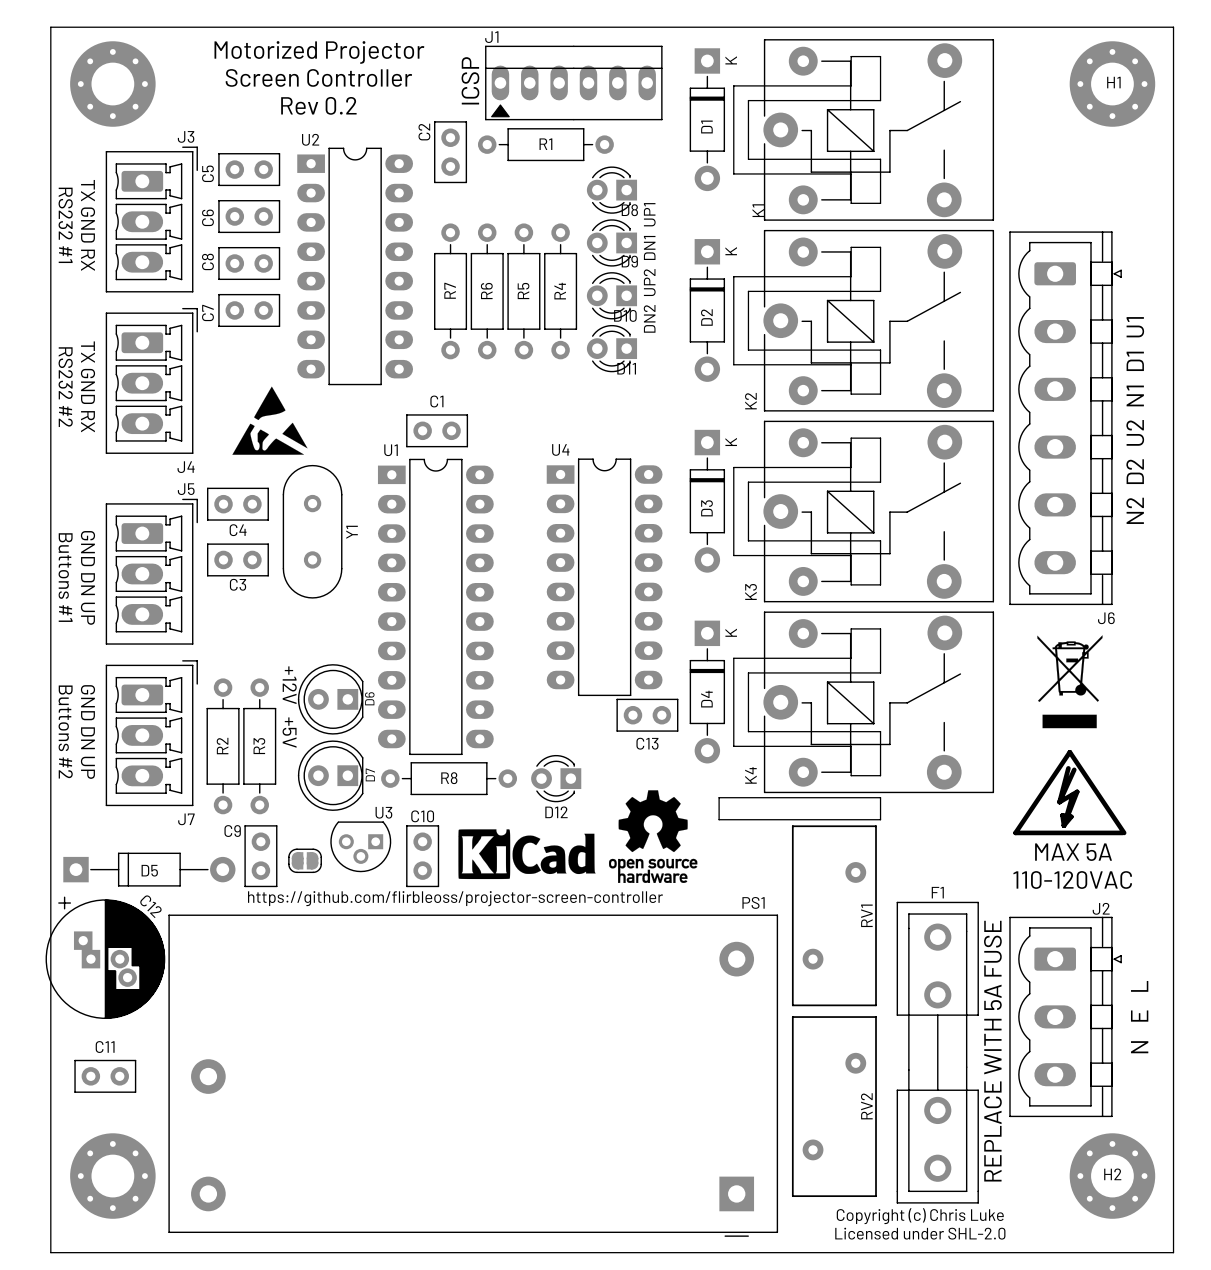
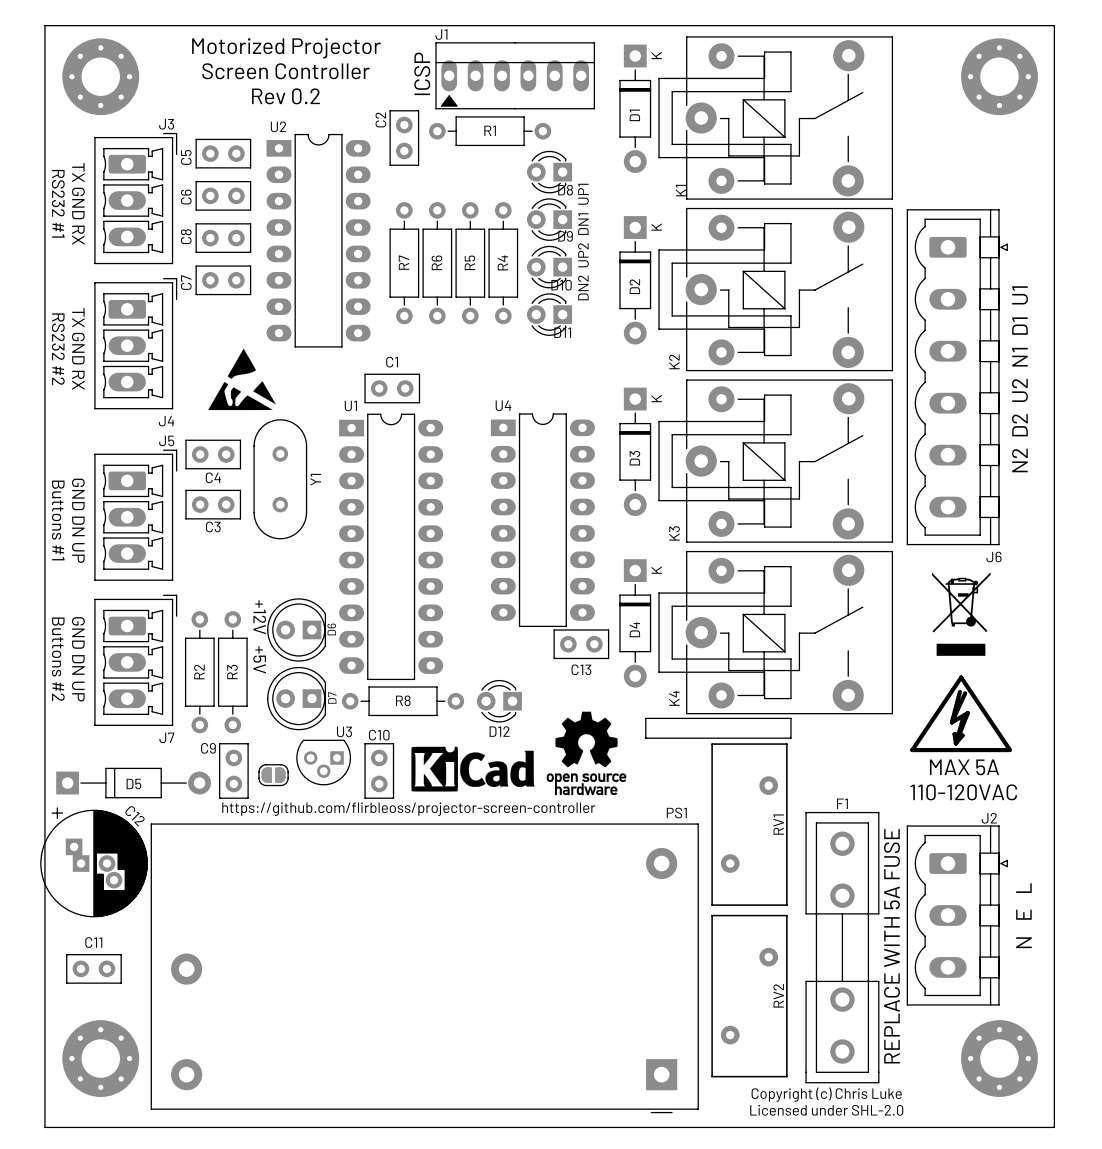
H1 name: H1 (1113, 82) -> none
H2 name: H2 (1112, 1174) -> none

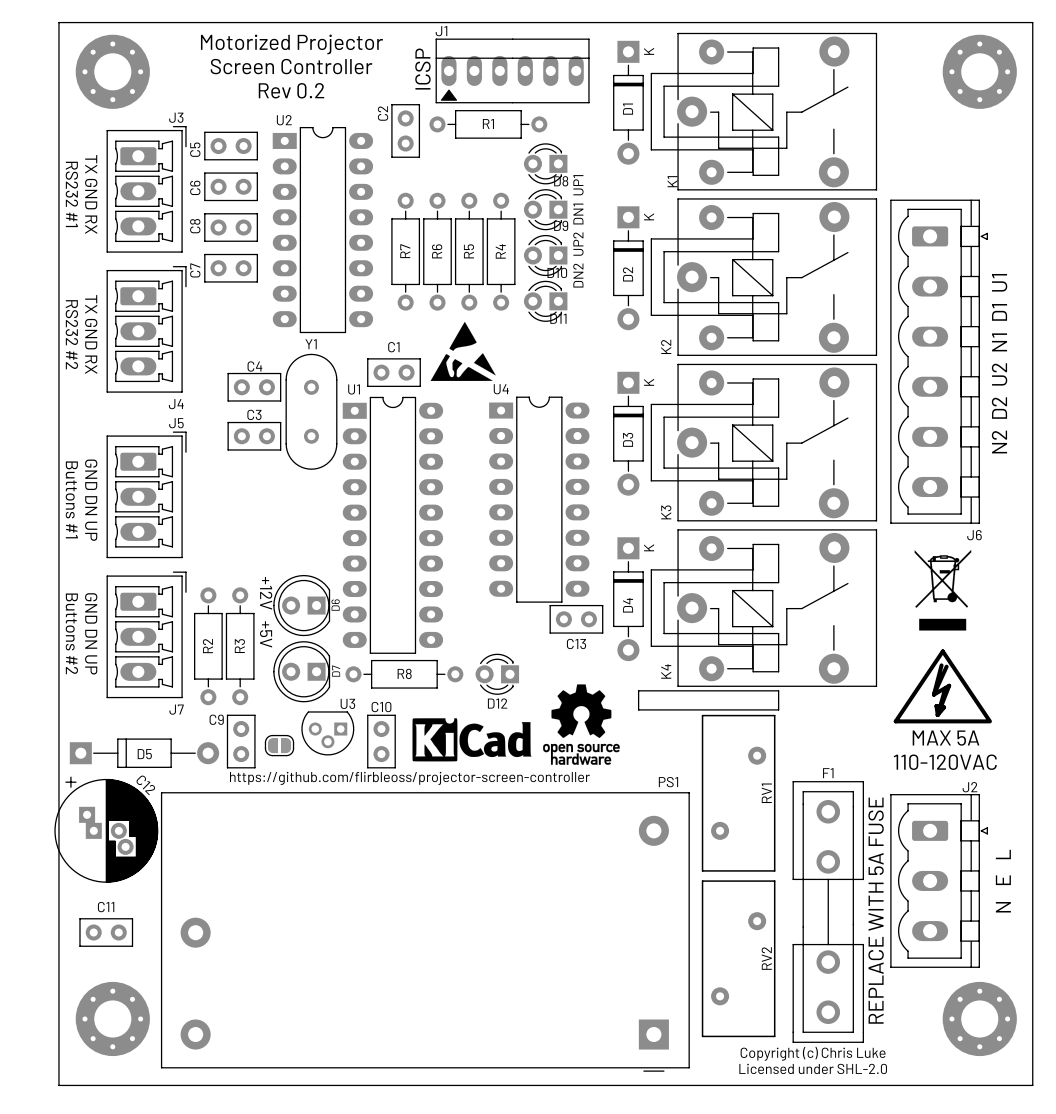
drawing position: (241, 379) -> (463, 351)
C4 position: (213, 454) -> (254, 387)
C4 name position: C4 (213, 477) -> C4 (254, 366)
Y1 position: (280, 479) -> (311, 411)
Y1 name rotation: 0° (315, 479) -> 90° clockwise (311, 344)
Y1 name position: Y1 (315, 479) -> Y1 (311, 344)
C3 position: (213, 504) -> (254, 436)
C3 name position: C3 (213, 526) -> C3 (254, 414)

